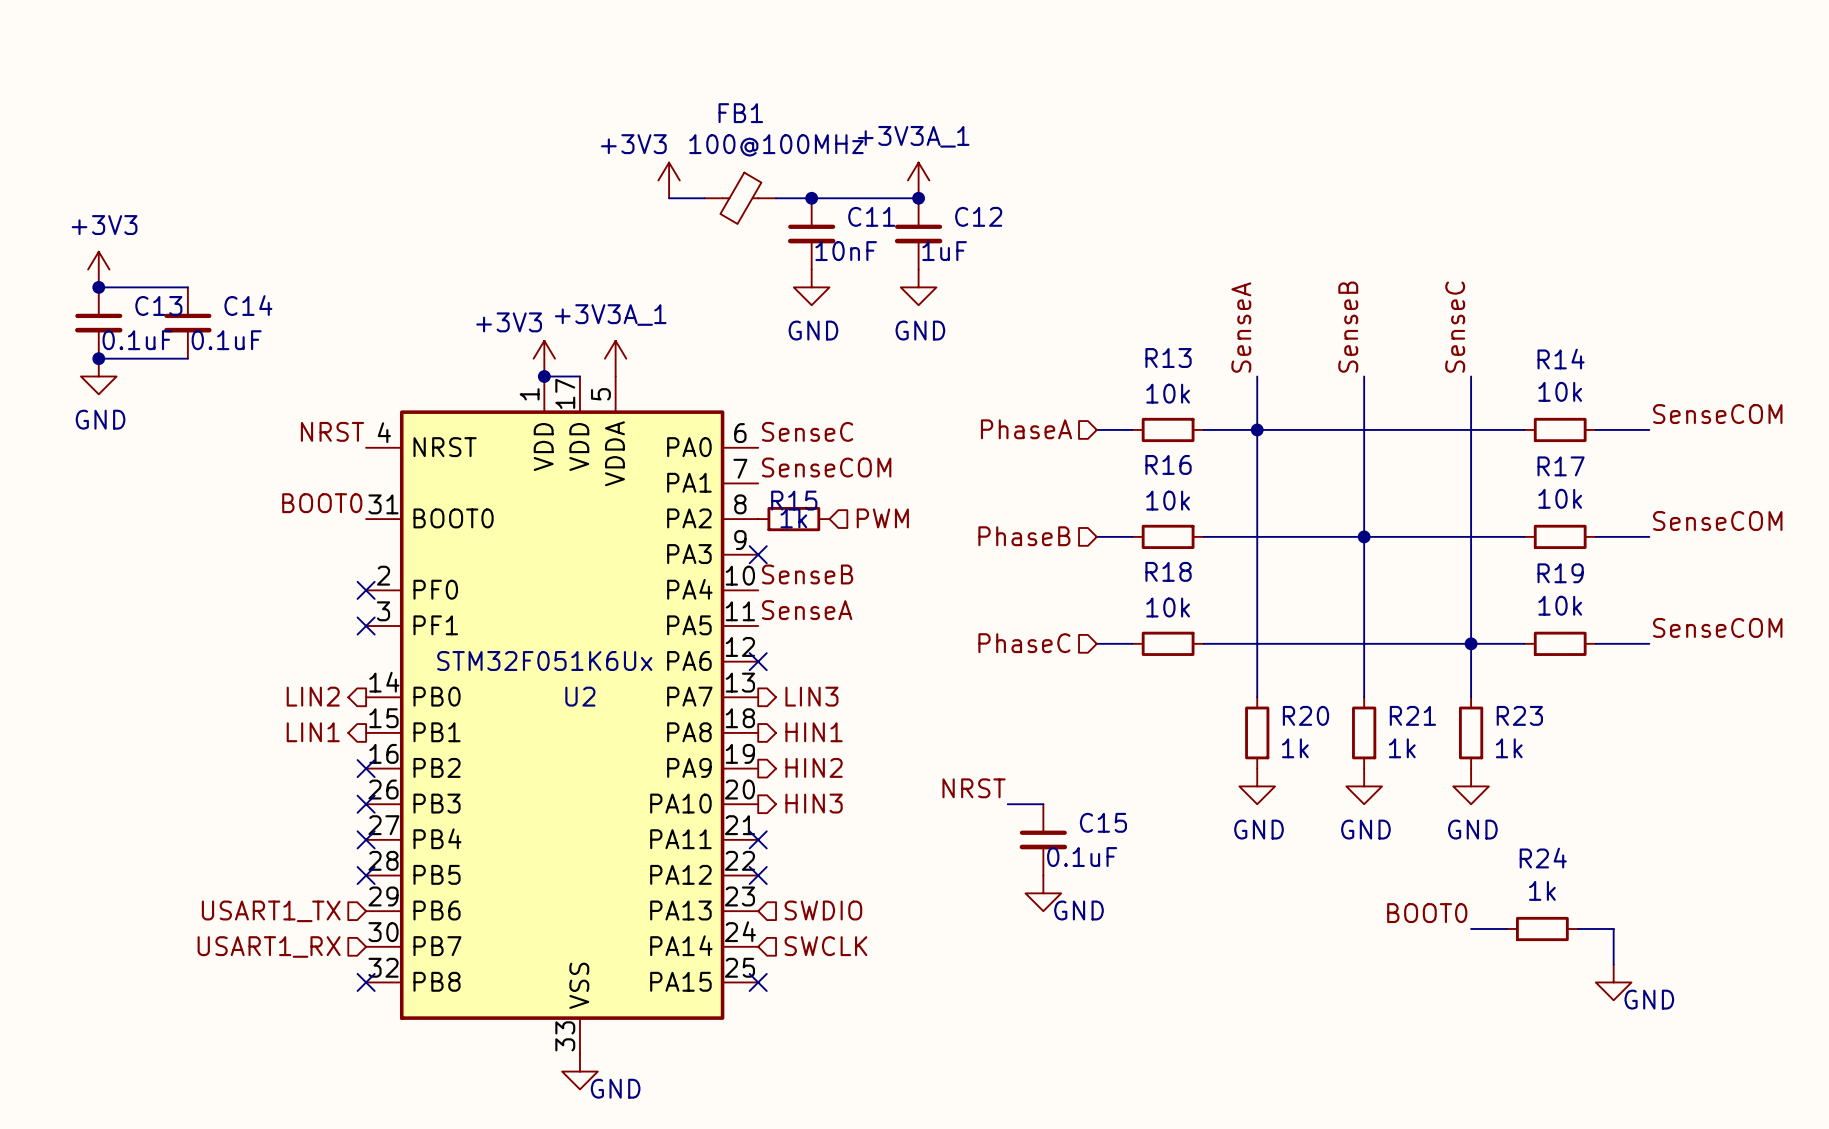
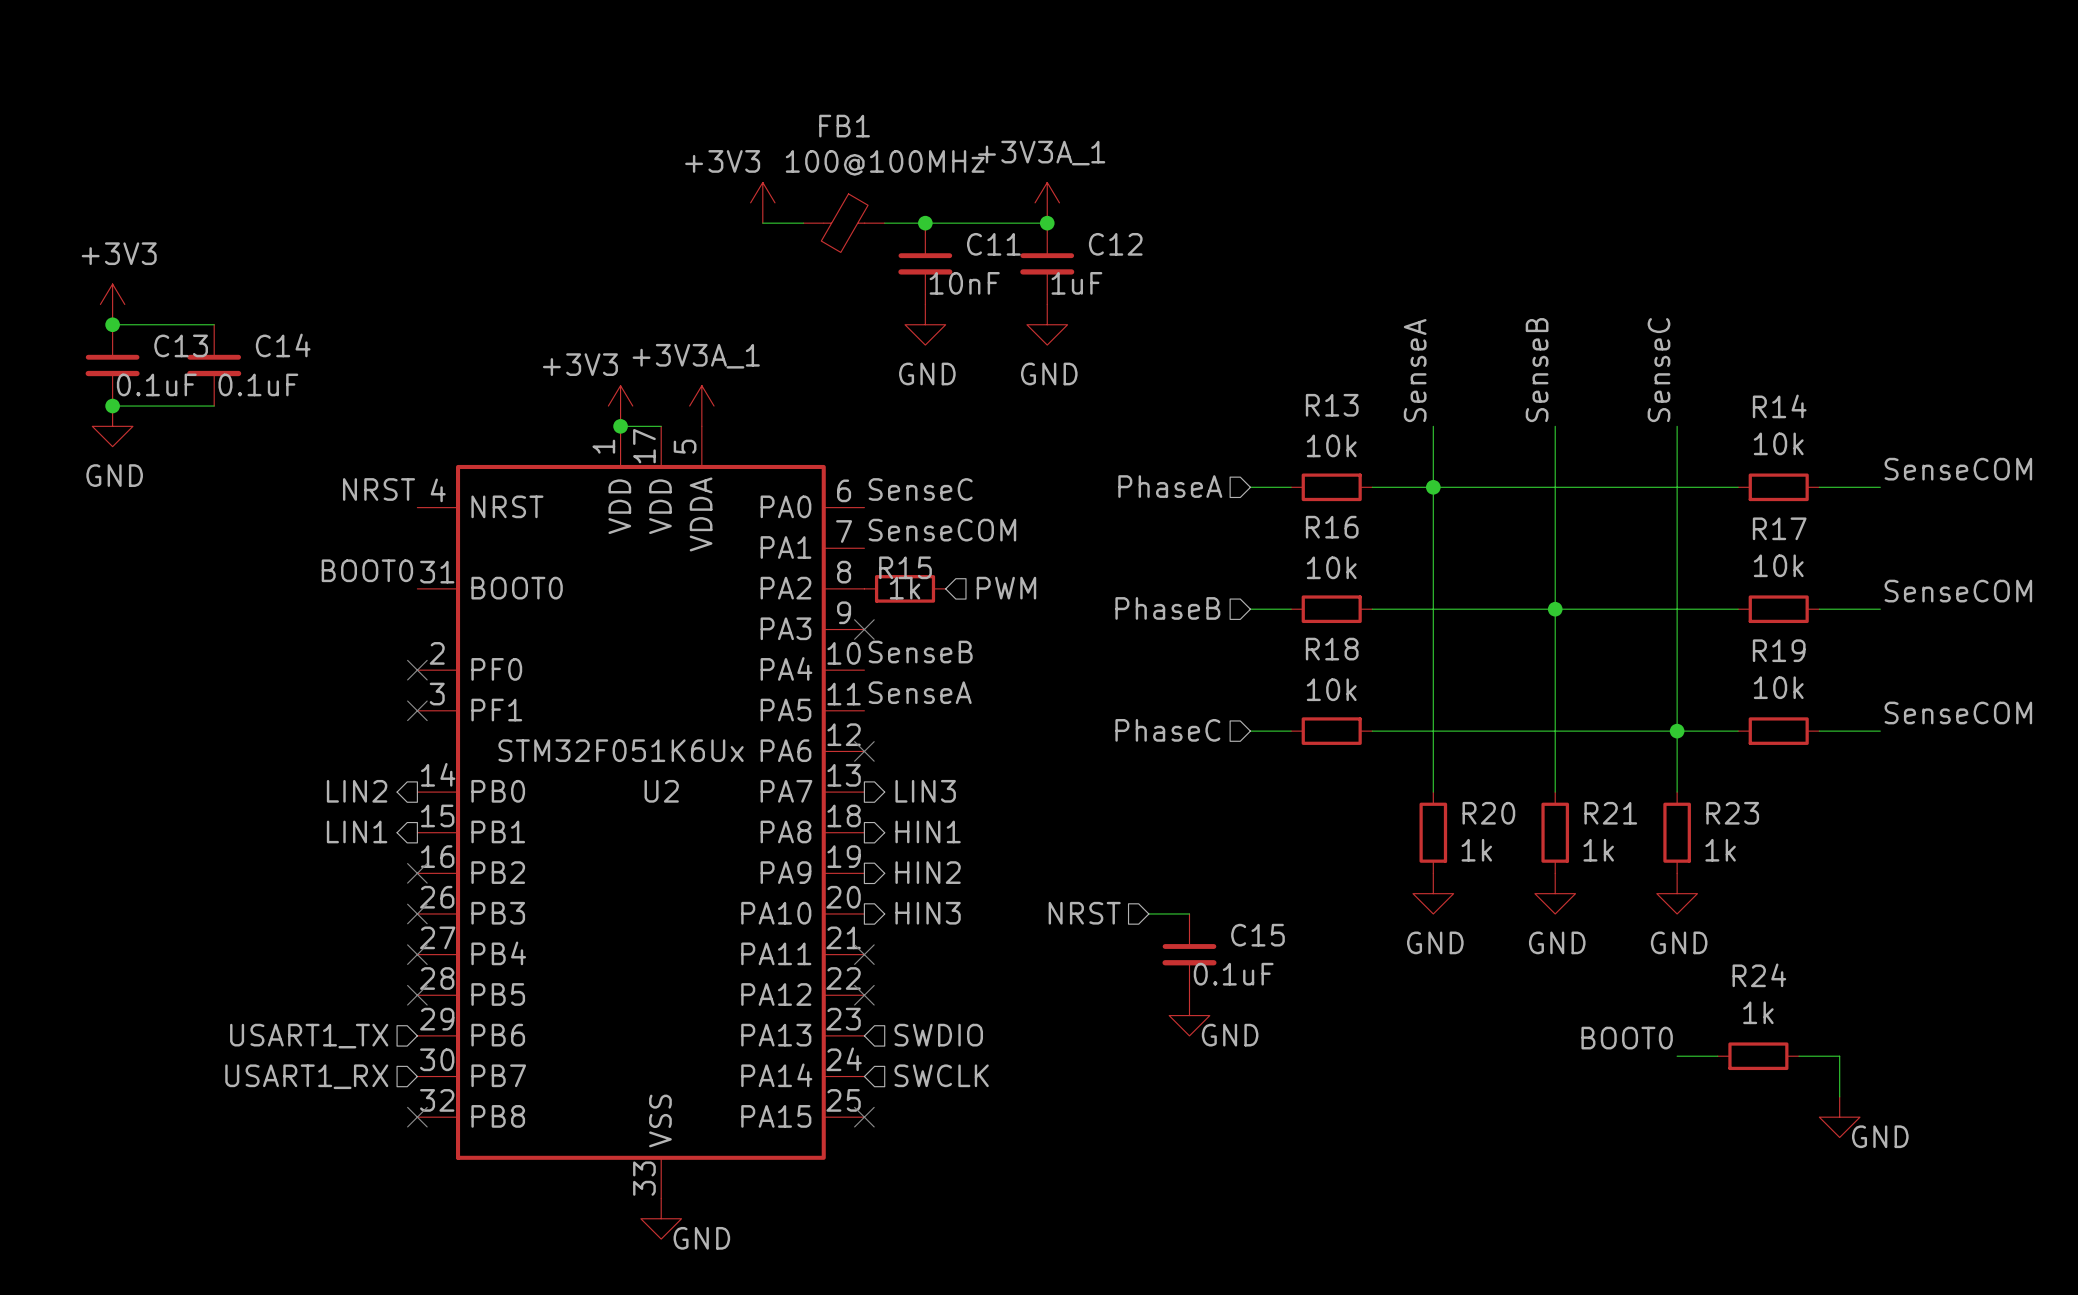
label: NRST (974, 788) -> none
hierarchical label: none -> NRST (1084, 913)

